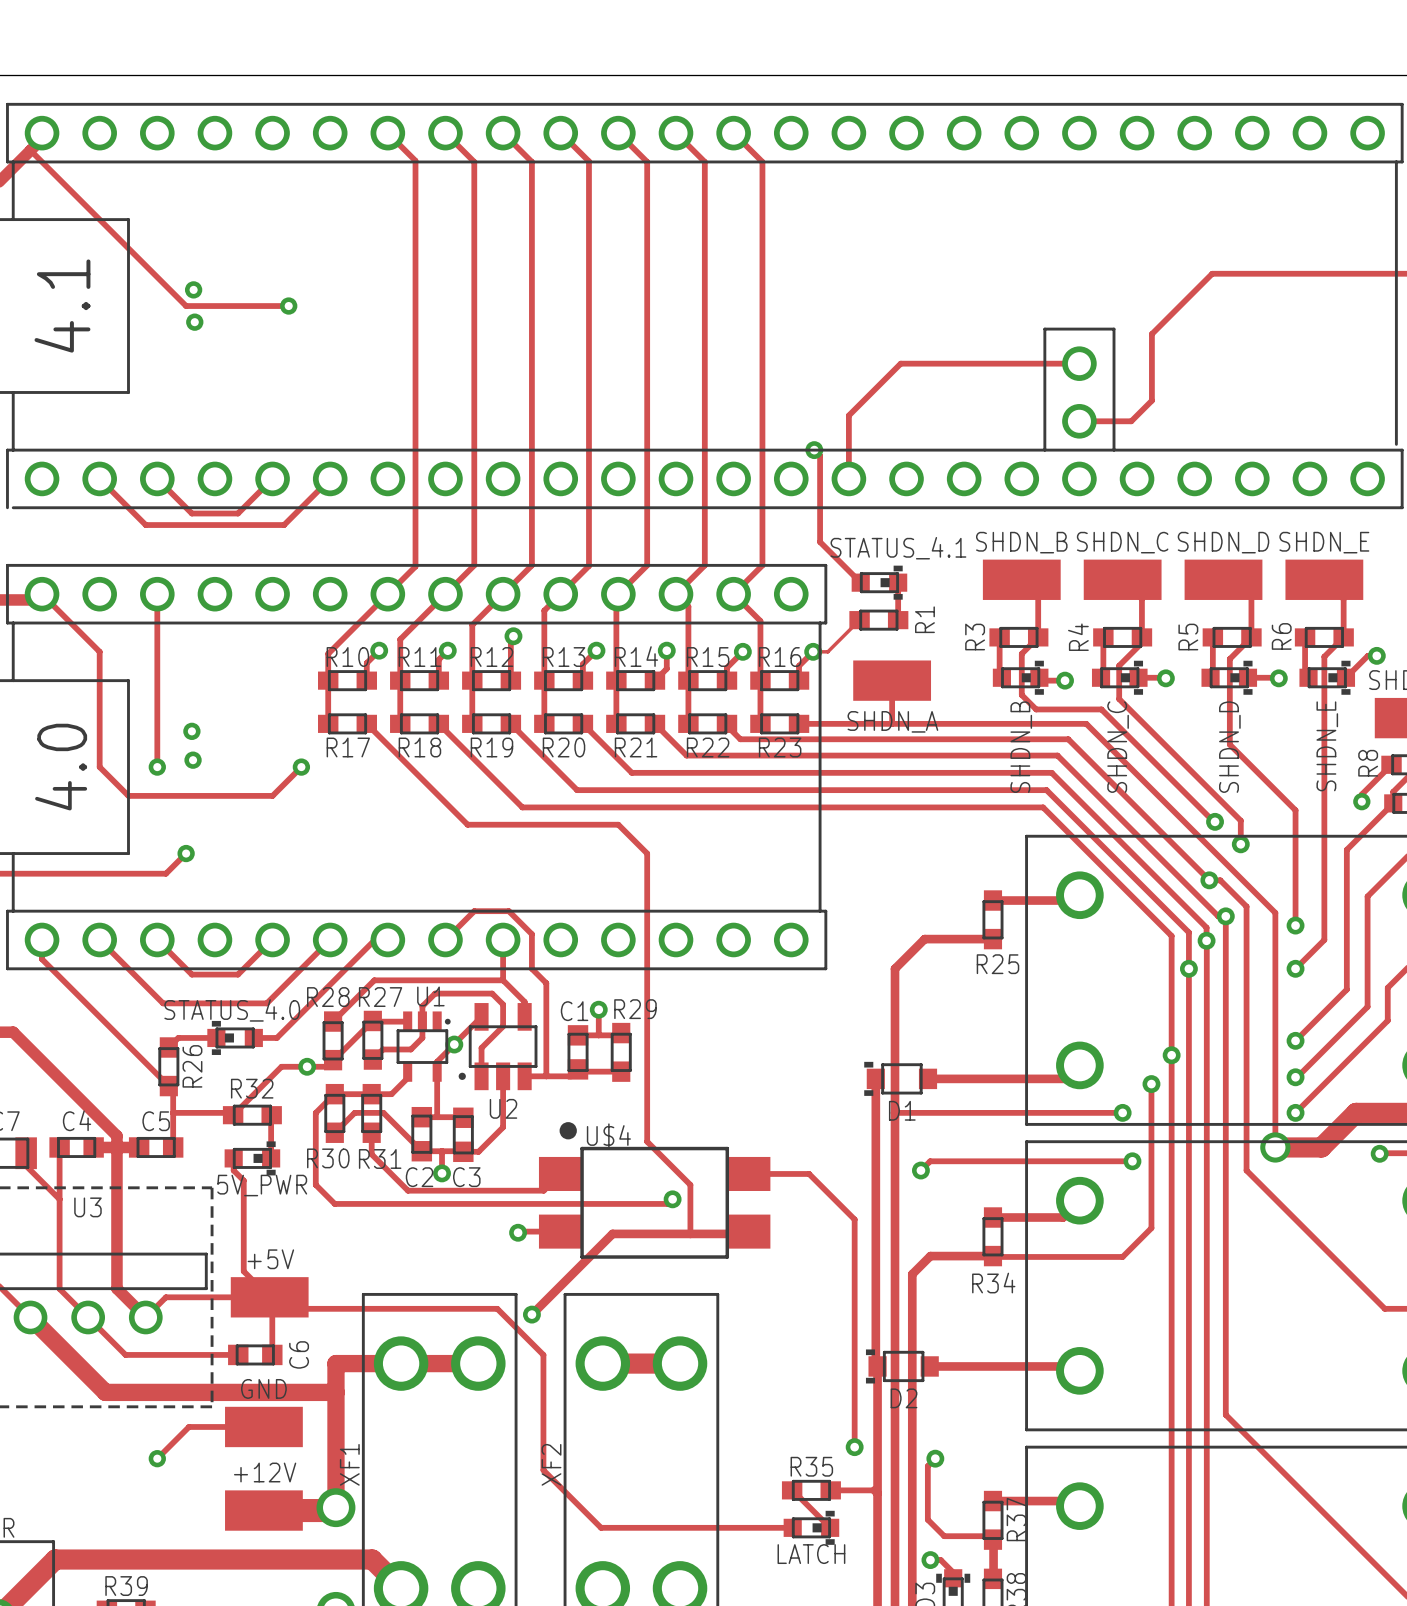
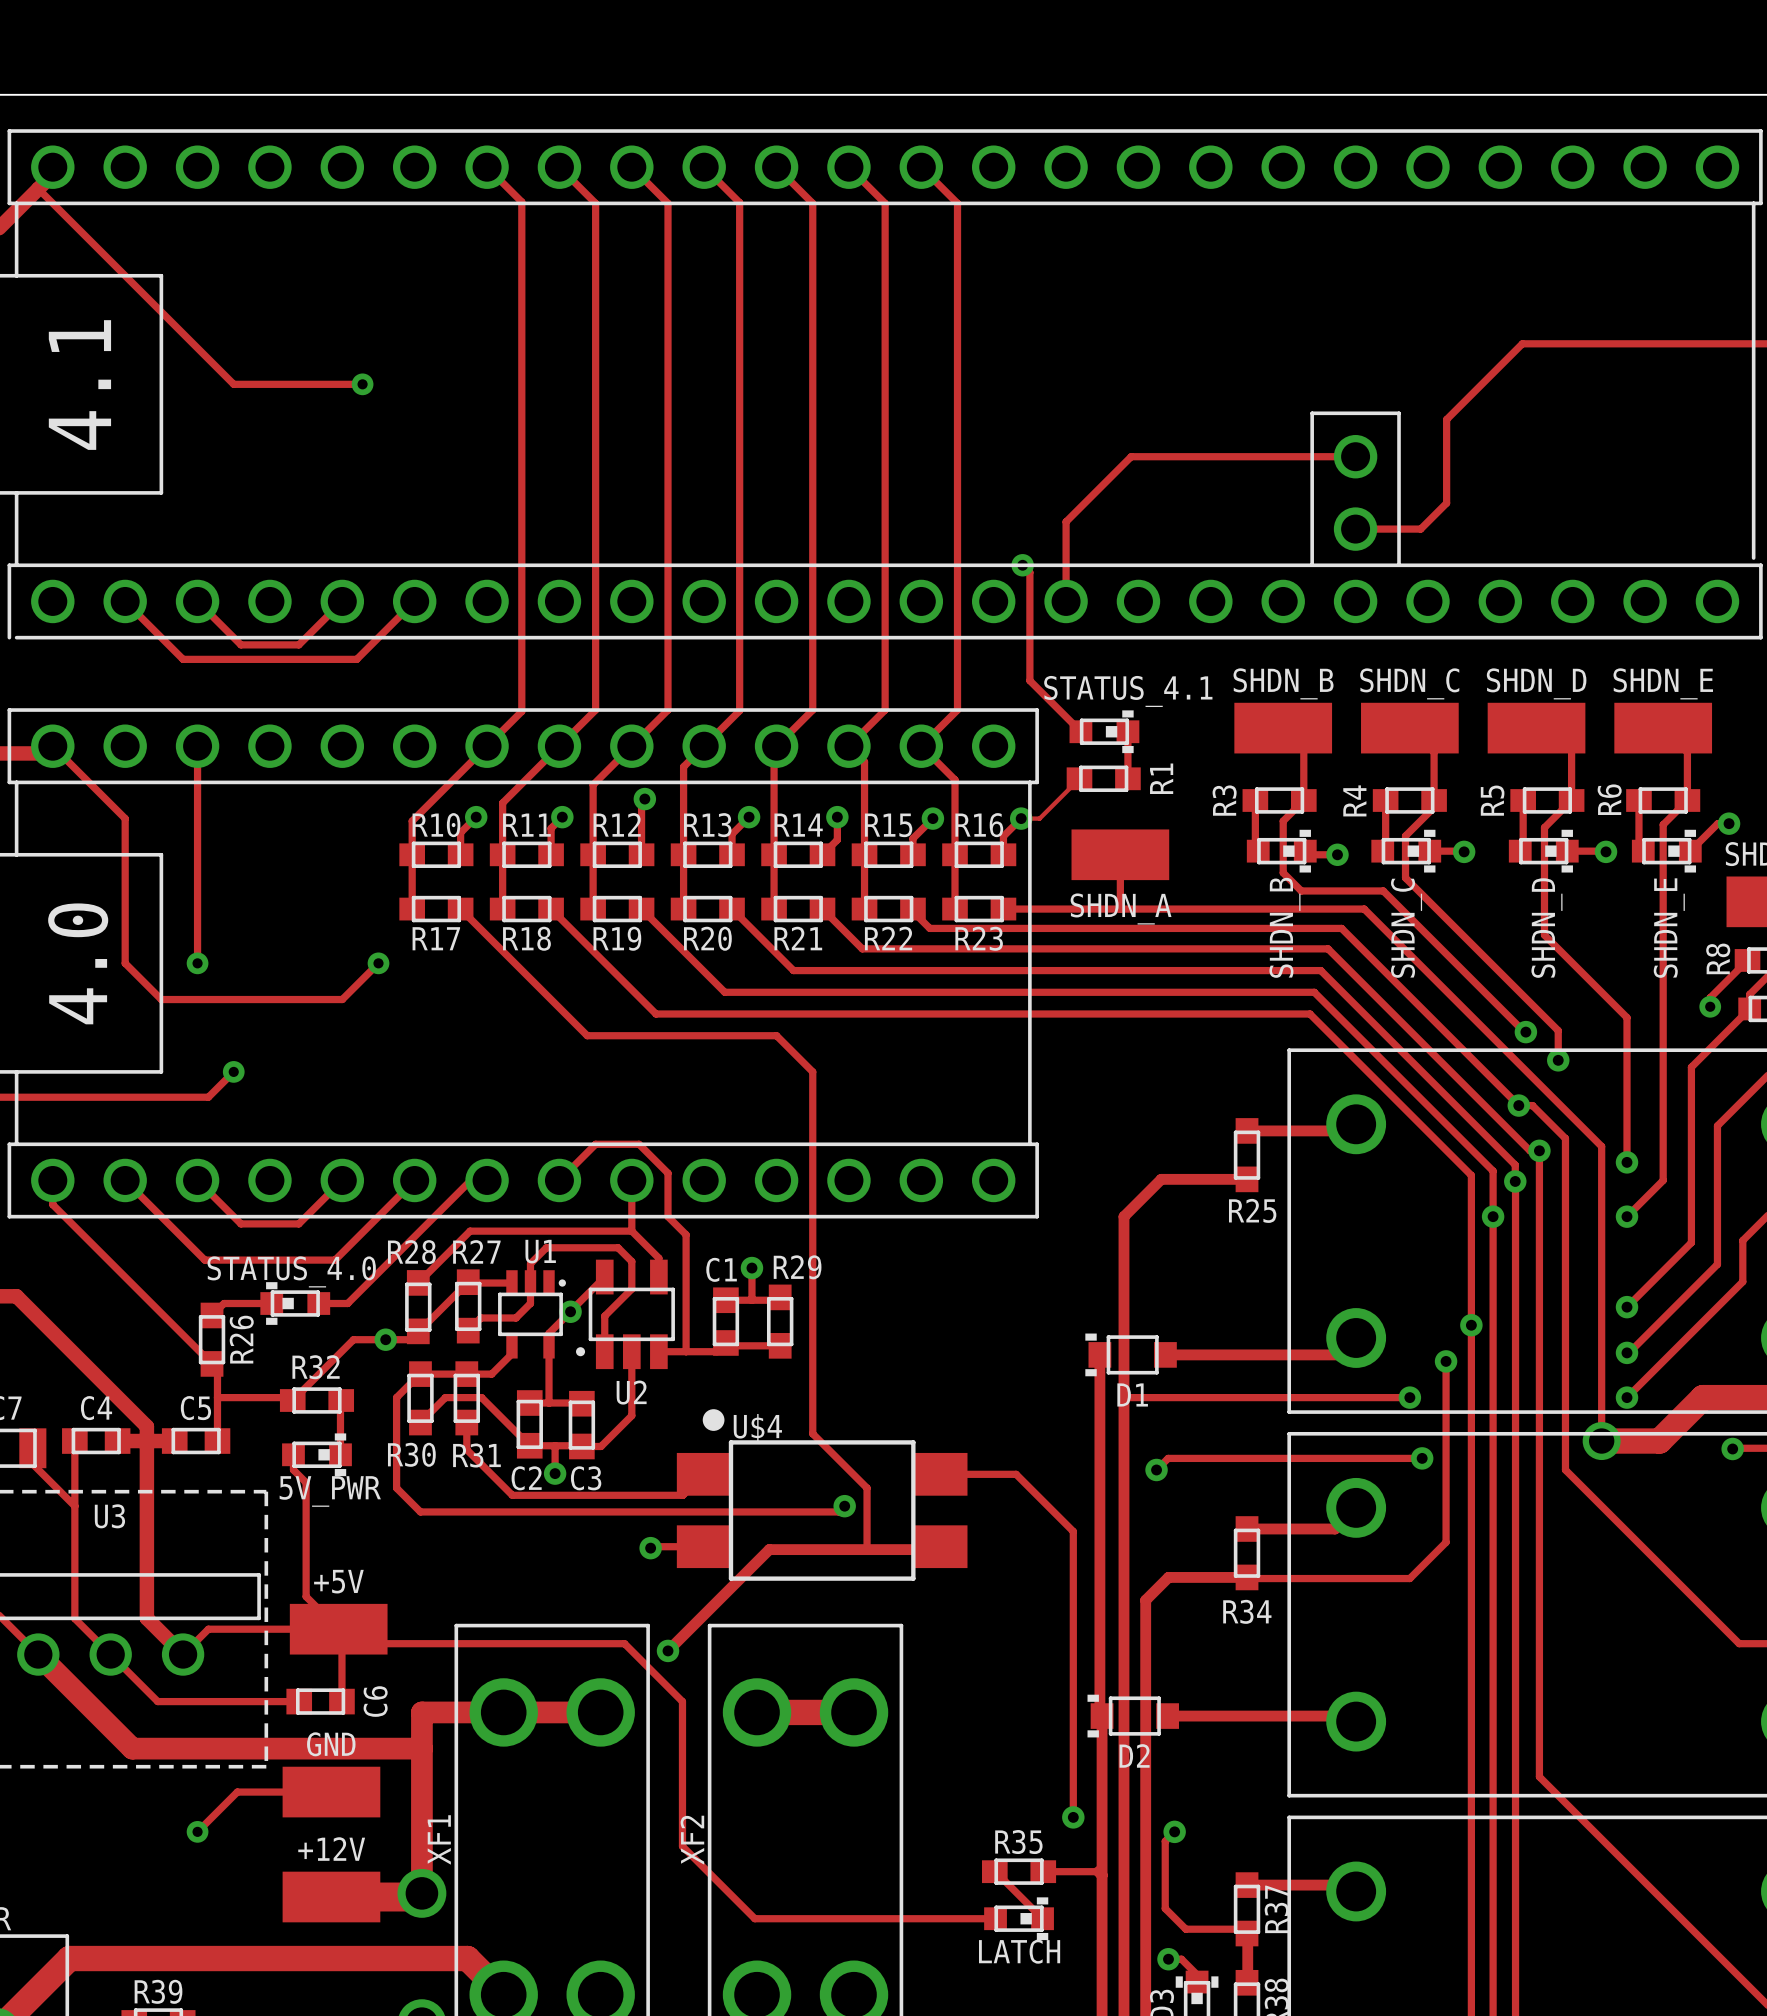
via: (193, 289) -> none
via: (194, 322) -> none
via: (191, 731) -> none
via: (193, 760) -> none

